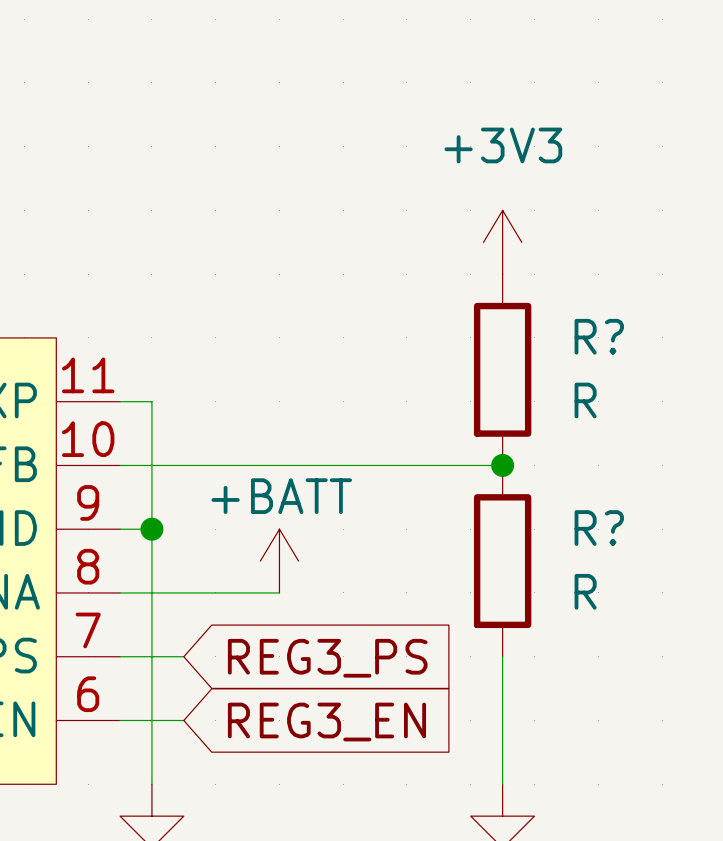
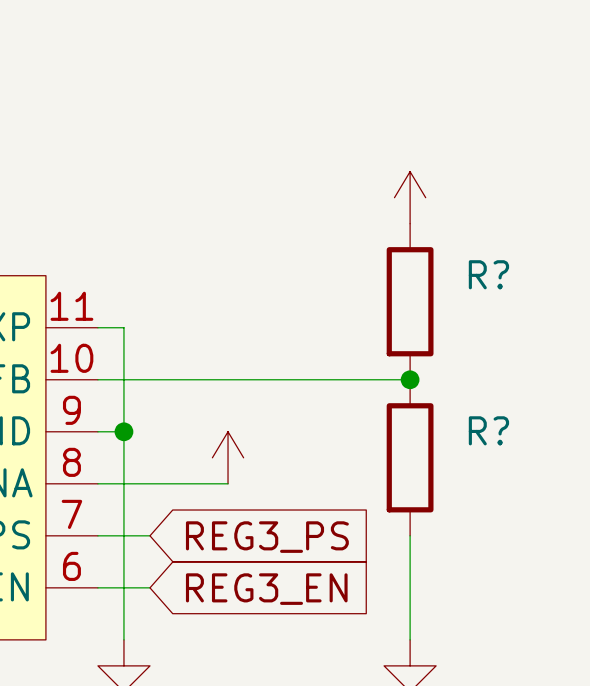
power symbol text: +3V3 (503, 145) -> none
R? value: R (585, 400) -> none
power symbol text: +BATT (281, 496) -> none
R? value: R (585, 591) -> none

